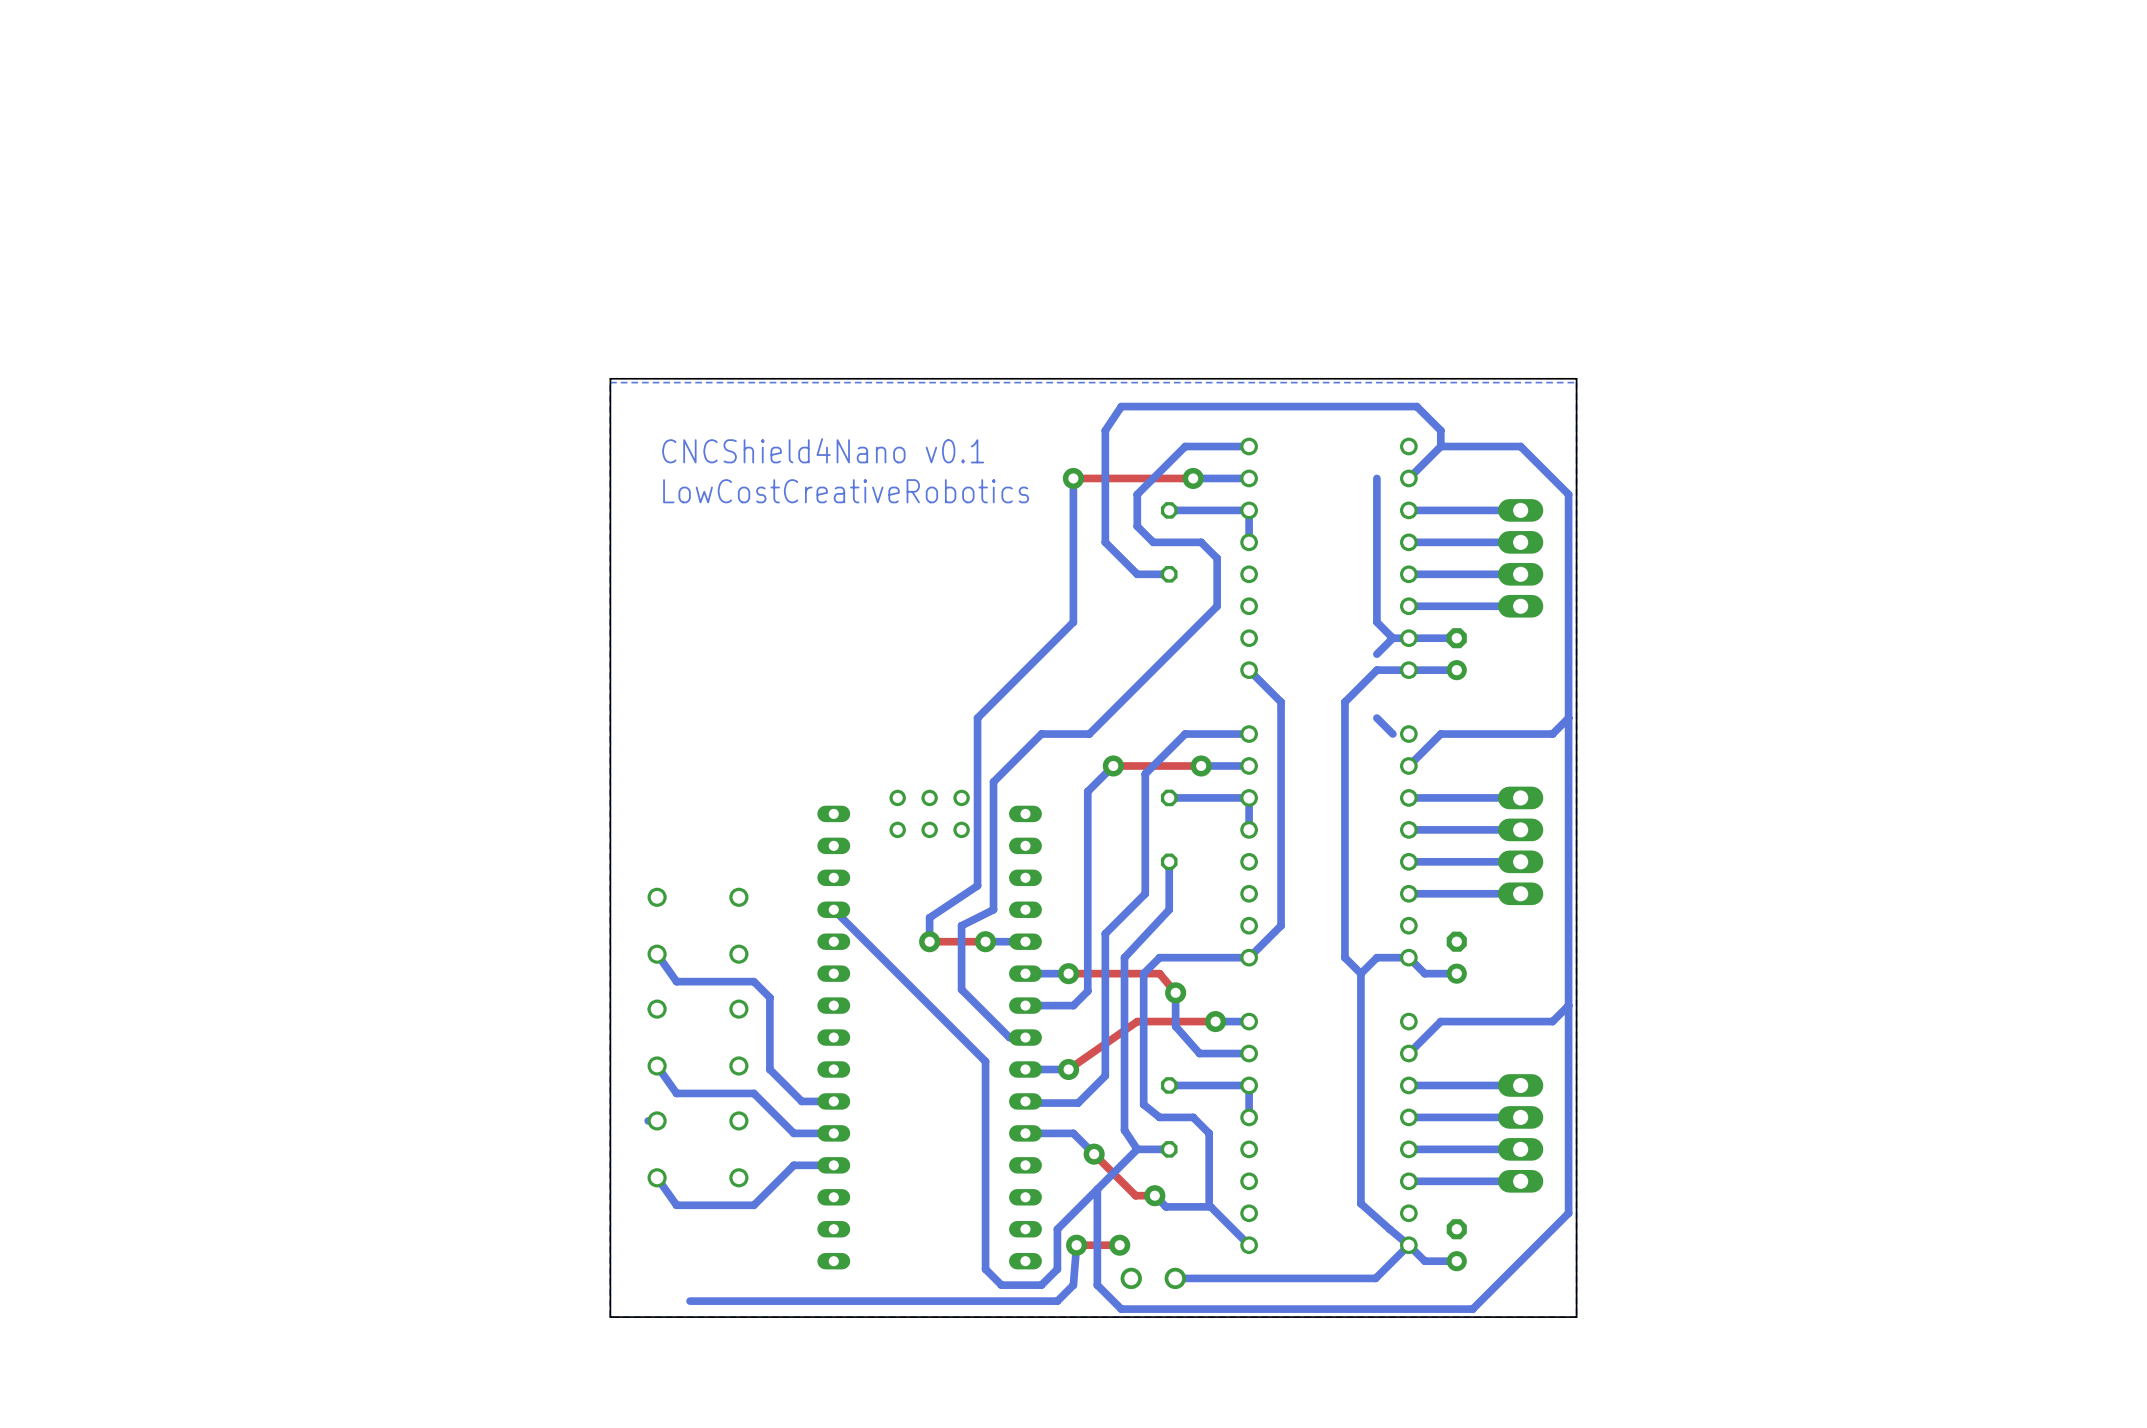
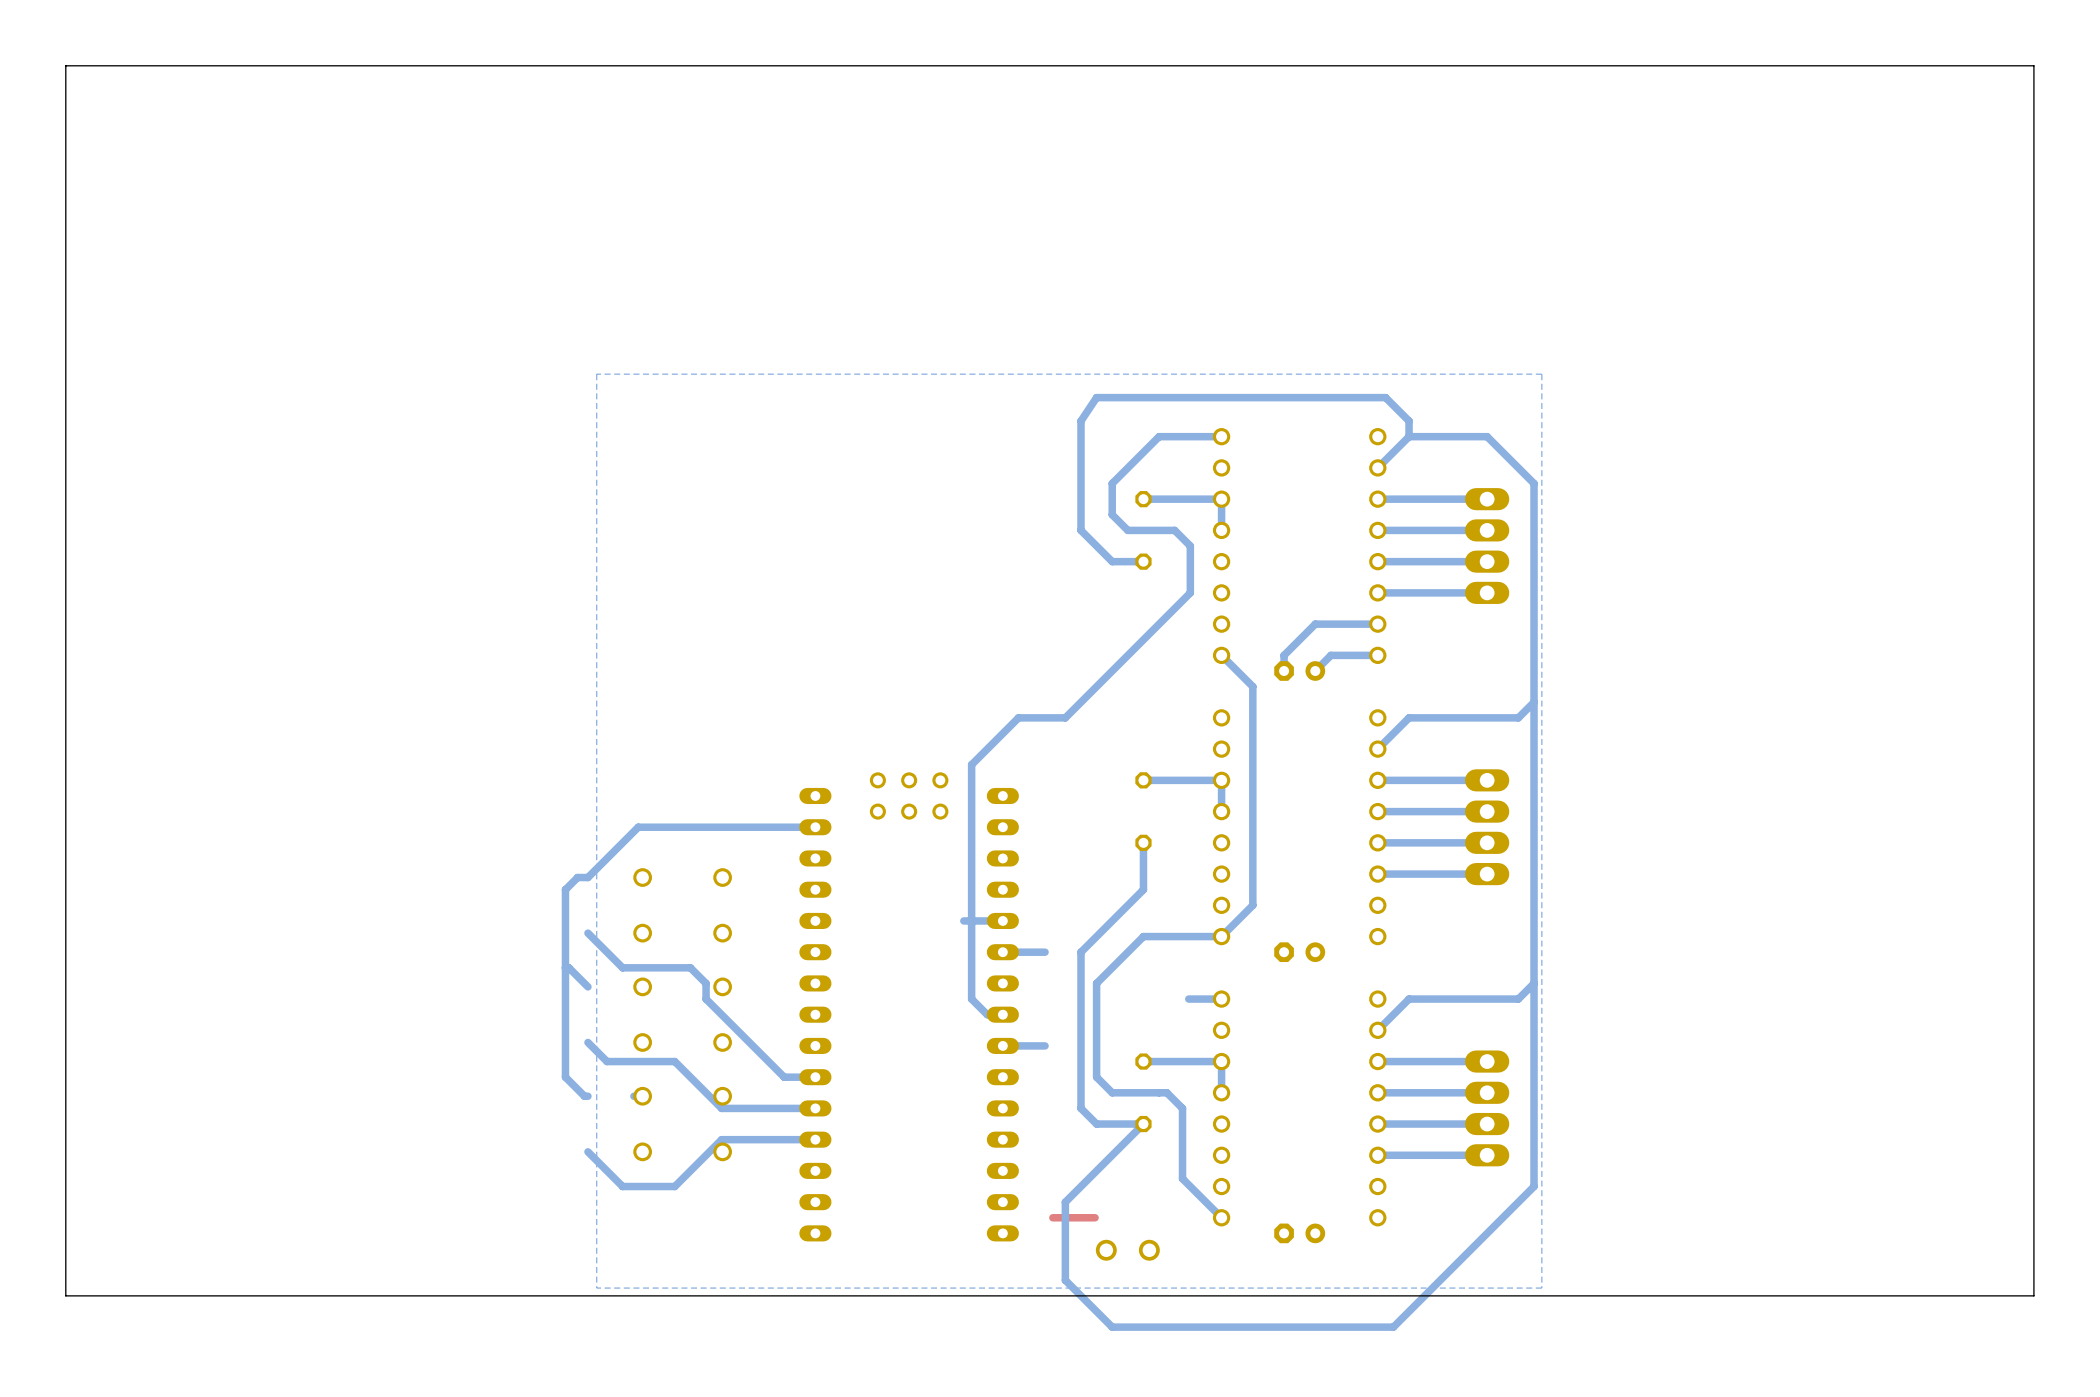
board edge: none -> (2033, 65) (65, 65) (65, 1295) (2033, 1295) (2033, 65)
board edge: (1576, 378) (610, 378) (610, 1317) (1576, 1317) (1576, 378) -> none
text: CNCShield4Nano v0.1 (823, 450) -> none
bottom track: (1073, 478) (1073, 622) (977, 718) (977, 885) (929, 917) (929, 941) -> none
via: (1073, 478) -> none
top track: (1193, 478) (1073, 478) -> none
via: (1193, 478) -> none
bottom track: (1249, 478) (1193, 478) -> none
bottom track: (1376, 478) (1376, 622) (1392, 638) (1376, 654) -> none
text: LowCostCreativeRobotics (846, 491) -> none
bottom track: none -> (1362, 624) (1315, 624) (1284, 655) (1284, 671)
bottom track: (1456, 638) (1408, 638) -> none
part rotation: 0° (1456, 654) -> 90° counterclockwise (1299, 671)
part position: (1456, 654) -> (1299, 671)
bottom track: (1376, 670) (1344, 702) (1344, 957) (1360, 973) -> (1346, 655) (1330, 655) (1315, 671)
bottom track: (1456, 670) (1408, 670) -> none
bottom track: (1376, 718) (1392, 734) -> none
bottom track: (1249, 734) (1185, 734) (1145, 773) (1145, 893) (1105, 933) (1105, 973) -> (1143, 889) (1080, 952)
bottom track: (1113, 765) (1087, 791) (1087, 991) (1073, 1005) (1025, 1005) -> none
via: (1113, 765) -> none
top track: (1201, 765) (1113, 765) -> none
via: (1201, 765) -> none
bottom track: (1249, 765) (1201, 765) -> none
bottom track: none -> (815, 827) (638, 827) (587, 877) (577, 877) (565, 889) (565, 1077) (584, 1096) (587, 1096)
bottom track: (993, 909) (961, 925) (961, 989) (993, 1021) -> (971, 889) (971, 999)
bottom track: (1169, 909) (1124, 957) (1124, 1130) (1137, 1149) (1057, 1229) (1057, 1269) (1041, 1285) (1001, 1285) (985, 1269) (985, 1061) (833, 909) -> none
via: (929, 941) -> none
top track: (985, 941) (929, 941) -> none
via: (985, 941) -> none
bottom track: (657, 954) (676, 981) (753, 981) (769, 997) (769, 1069) -> (587, 933) (622, 967) (690, 967) (706, 983) (706, 999) (752, 1045)
bottom track: (1169, 957) (1159, 957) (1143, 973) (1143, 1104) (1159, 1117) -> (1143, 936) (1096, 983) (1096, 1077) (1112, 1092) (1134, 1092)
part rotation: 0° (1456, 957) -> 90° counterclockwise (1299, 952)
part position: (1456, 957) -> (1299, 952)
top track: (1068, 973) (1159, 973) (1175, 992) -> none
via: (1068, 973) -> none
bottom track: (1360, 973) (1360, 1203) (1408, 1245) -> none
bottom track: (1456, 973) (1424, 973) (1408, 957) (1376, 957) (1360, 973) -> none
bottom track: none -> (565, 967) (568, 967) (587, 986)
bottom track: (1175, 992) (1175, 1026) (1199, 1053) (1249, 1053) -> none
via: (1175, 992) -> none
top track: (1215, 1021) (1137, 1021) (1068, 1069) -> none
via: (1215, 1021) -> none
bottom track: (657, 1065) (676, 1093) (753, 1093) (793, 1133) -> (587, 1042) (607, 1061) (674, 1061) (721, 1108) (776, 1108)
via: (1068, 1069) -> none
bottom track: (1105, 1075) (1078, 1103) (1027, 1103) (1025, 1101) -> (1080, 1052) (1080, 1108) (1096, 1124) (1112, 1124)
bottom track: (1025, 1133) (1073, 1133) (1094, 1154) -> none
top track: (1094, 1154) (1135, 1195) (1154, 1195) -> none
via: (1094, 1154) -> none
bottom track: (793, 1165) (753, 1205) (676, 1205) (657, 1177) -> (776, 1139) (721, 1139) (674, 1186) (622, 1186) (587, 1151)
bottom track: (1097, 1189) (1097, 1285) (1121, 1309) (1472, 1309) -> (1143, 1124) (1065, 1202) (1065, 1280) (1112, 1327) (1393, 1327) (1440, 1280)
bottom track: (1154, 1195) (1166, 1206) (1210, 1206) -> none
via: (1154, 1195) -> none
bottom track: (1076, 1245) (1073, 1285) (1057, 1301) (690, 1301) -> none
via: (1076, 1245) -> none
via: (1119, 1245) -> none
bottom track: (1408, 1245) (1375, 1278) (1175, 1278) -> none
bottom track: (1408, 1245) (1424, 1261) (1456, 1261) -> none
part rotation: 0° (1456, 1245) -> 90° counterclockwise (1299, 1233)
part position: (1456, 1245) -> (1299, 1233)

